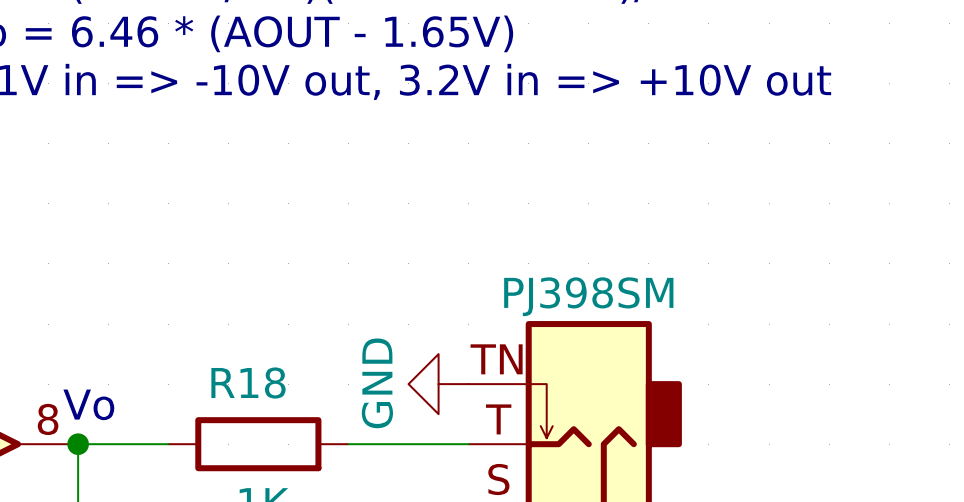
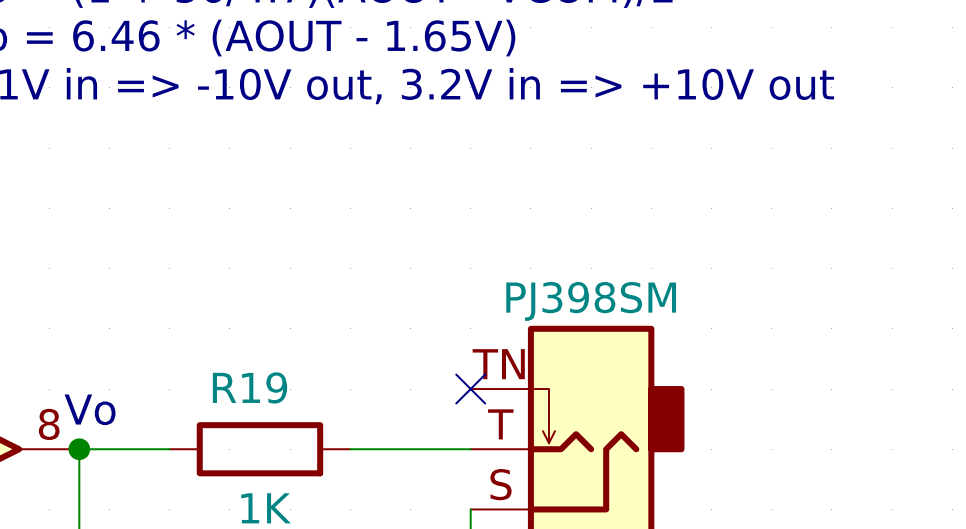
R18 name: R18 (248, 383) -> R19 (250, 387)
power symbol: GND (438, 384) -> none
no-connect mark: none -> (470, 389)

